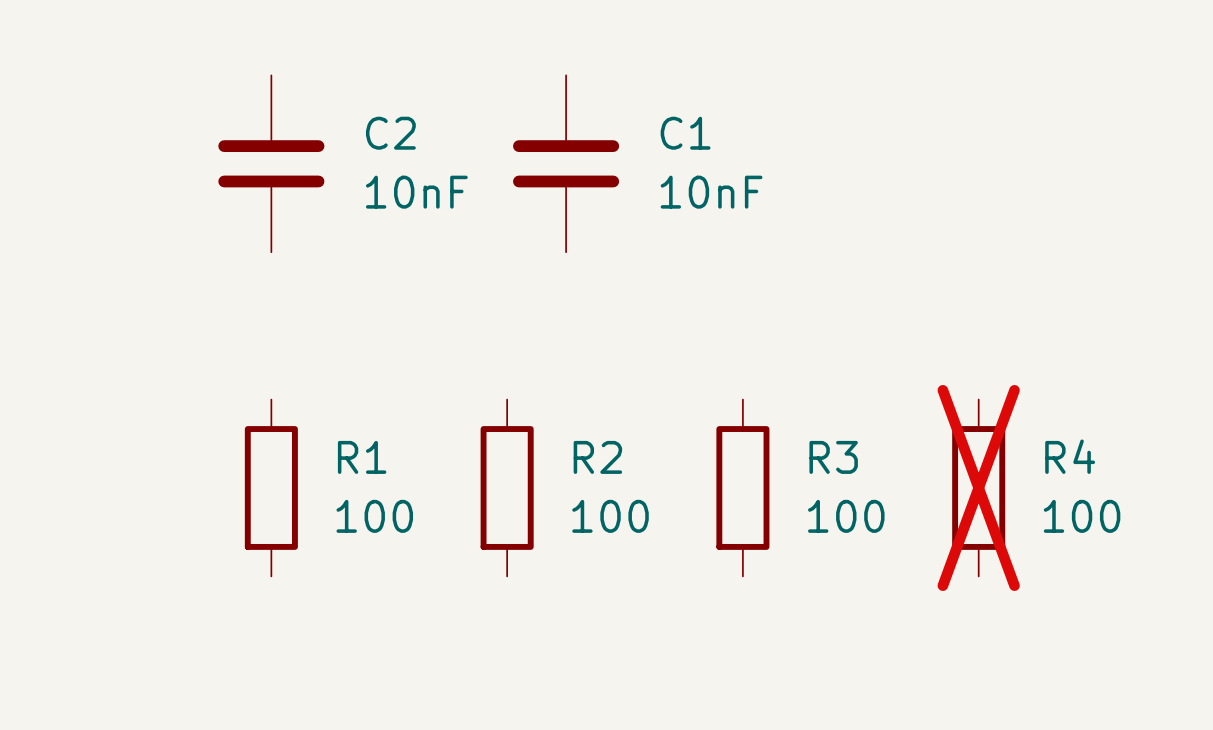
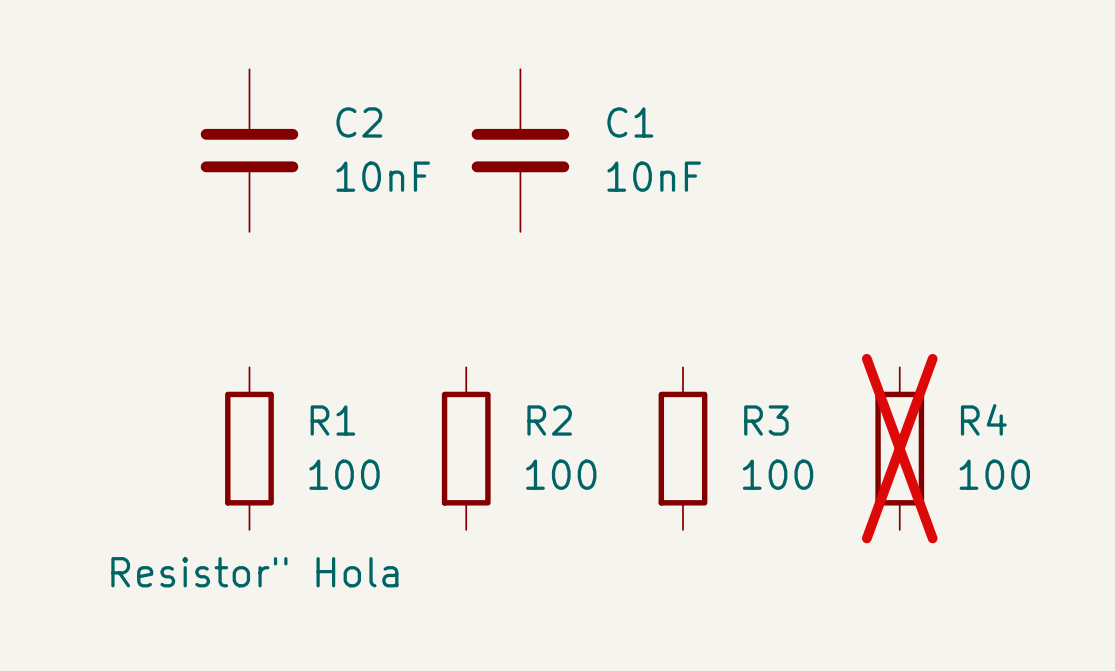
R1 text: none -> Resistor" Hola (254, 572)

